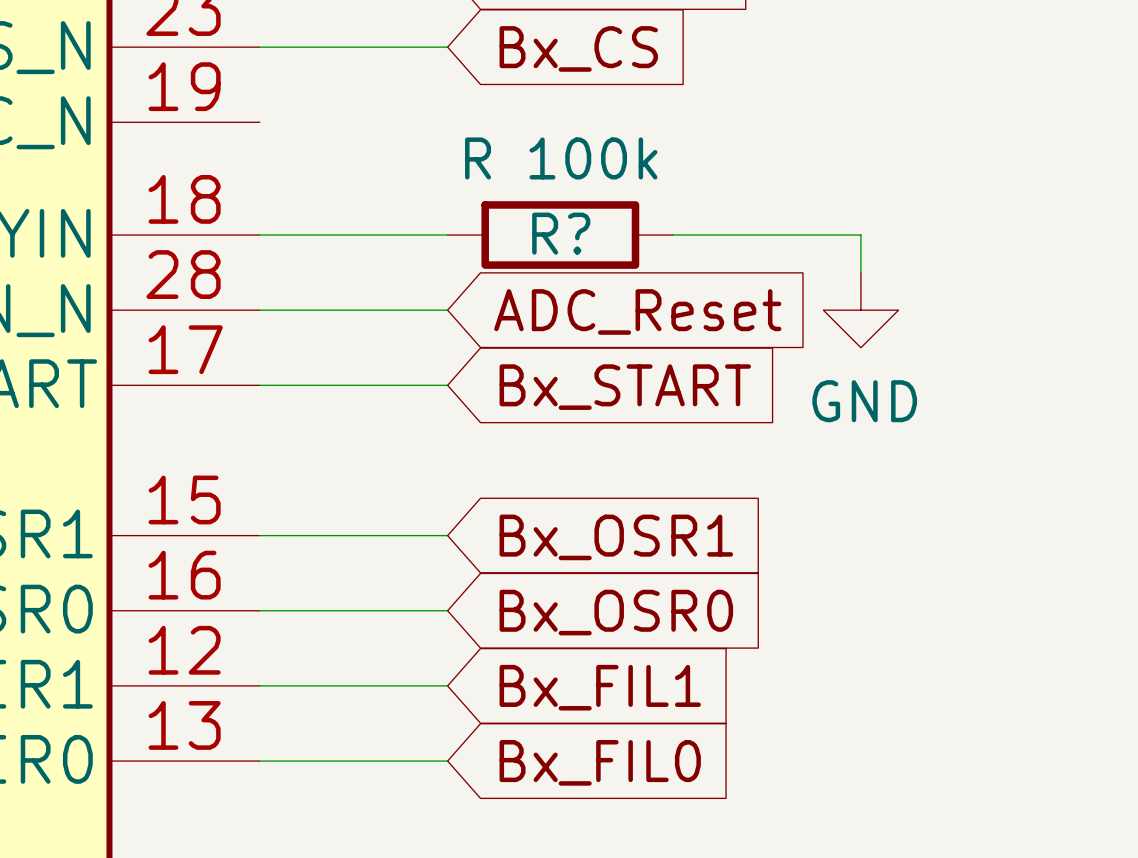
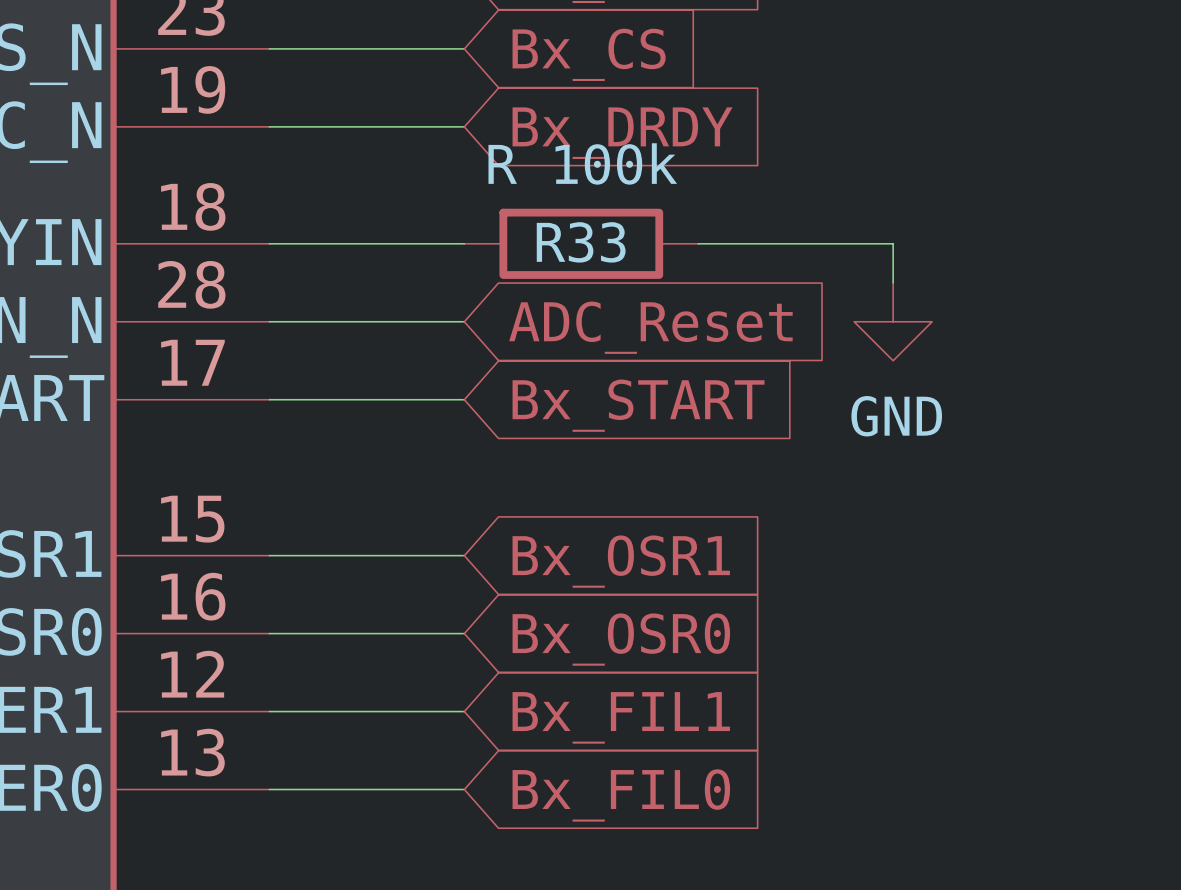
wire: none -> (269, 126) (464, 126)
global label: none -> Bx_DRDY (622, 133)
R? name: R? (561, 233) -> R33 (581, 242)

